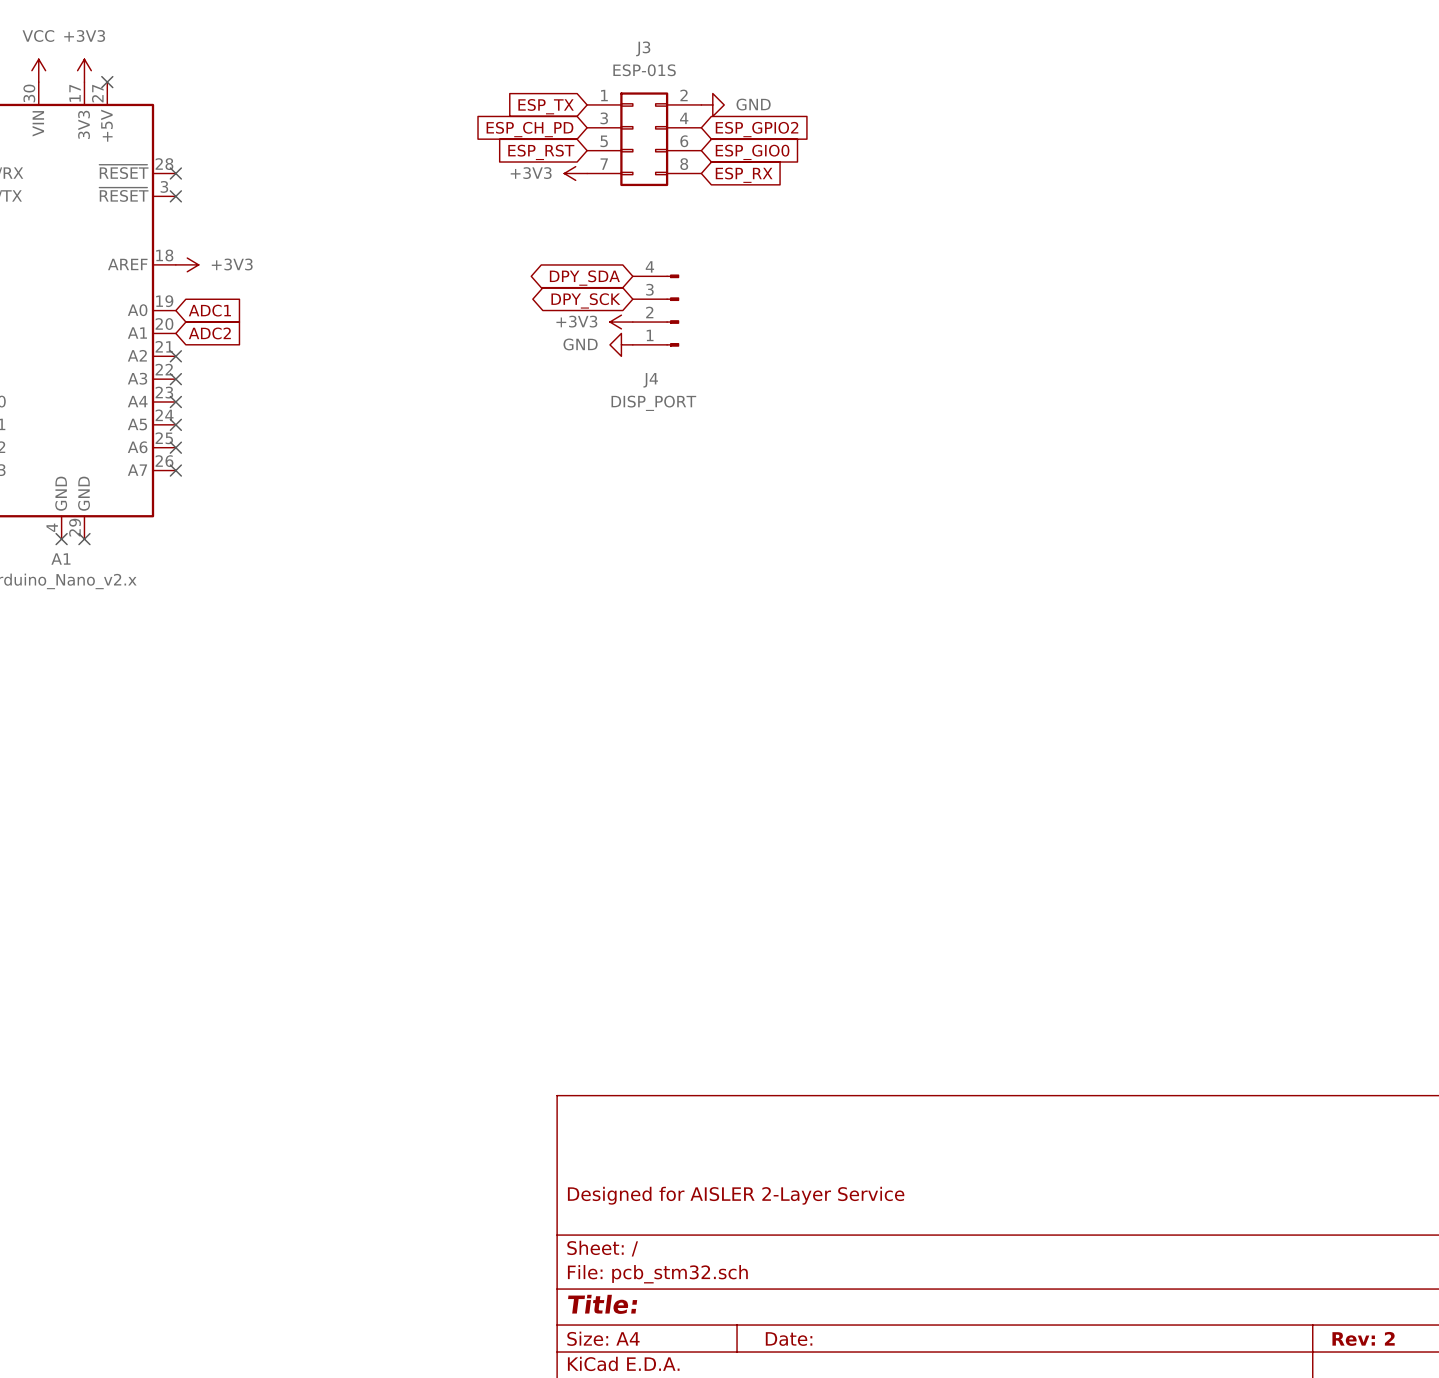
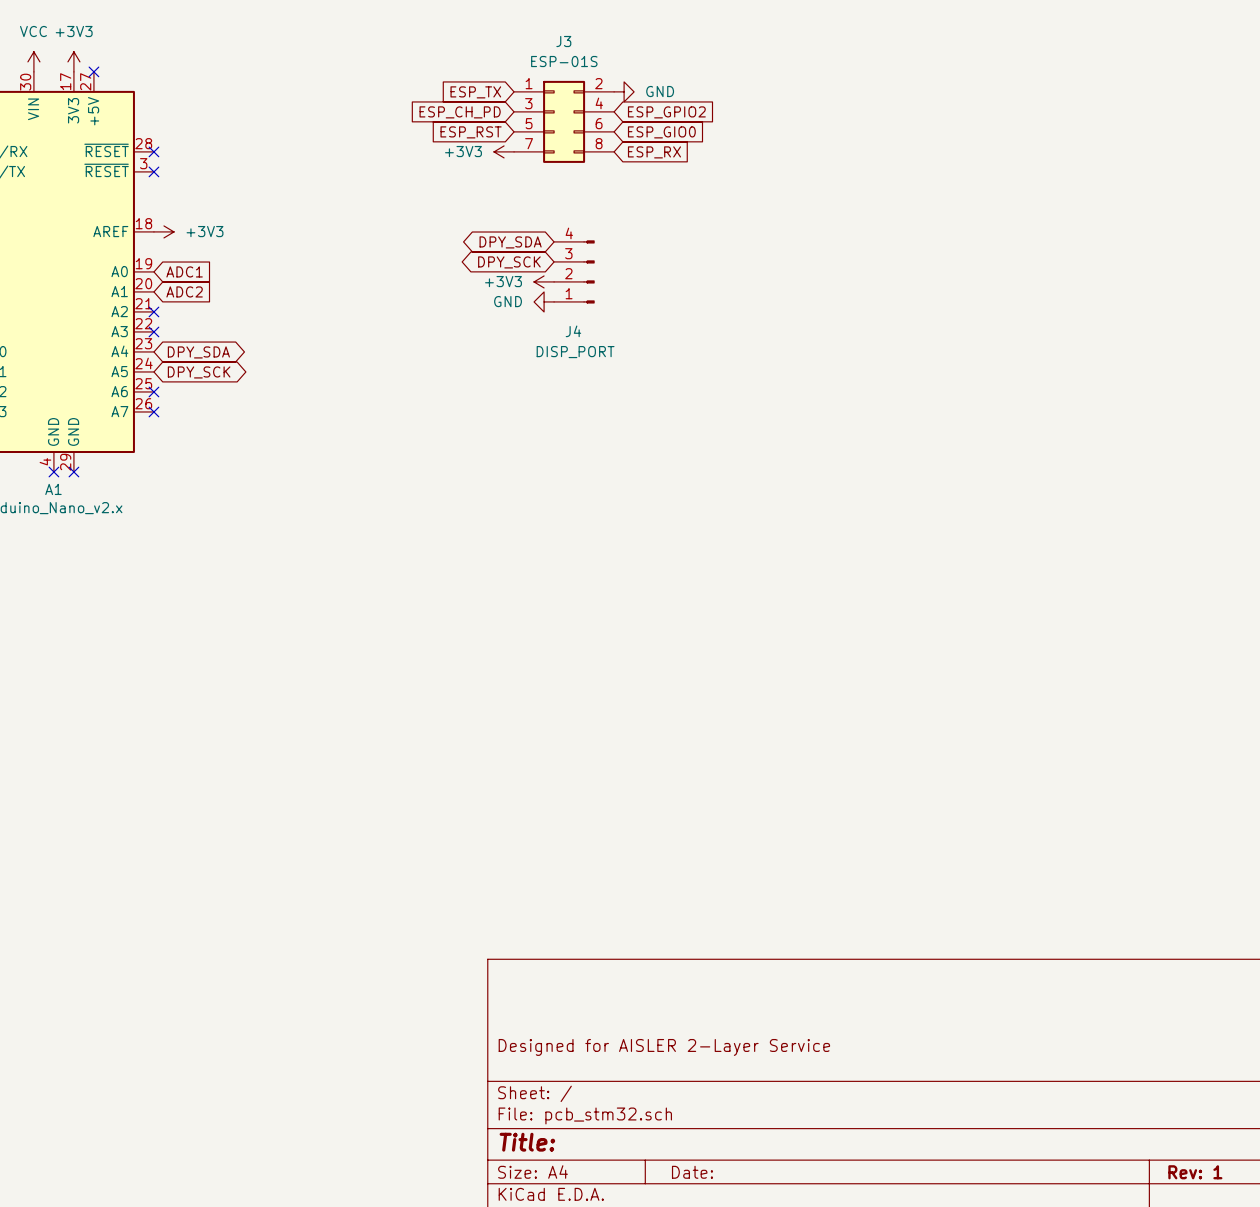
no-connect mark: (175, 402) -> none
global label: none -> DPY_SDA (198, 352)
no-connect mark: (175, 424) -> none
global label: none -> DPY_SCK (199, 372)
title block: Rev: 2 (1363, 1338) -> Rev: 1 (1195, 1172)

